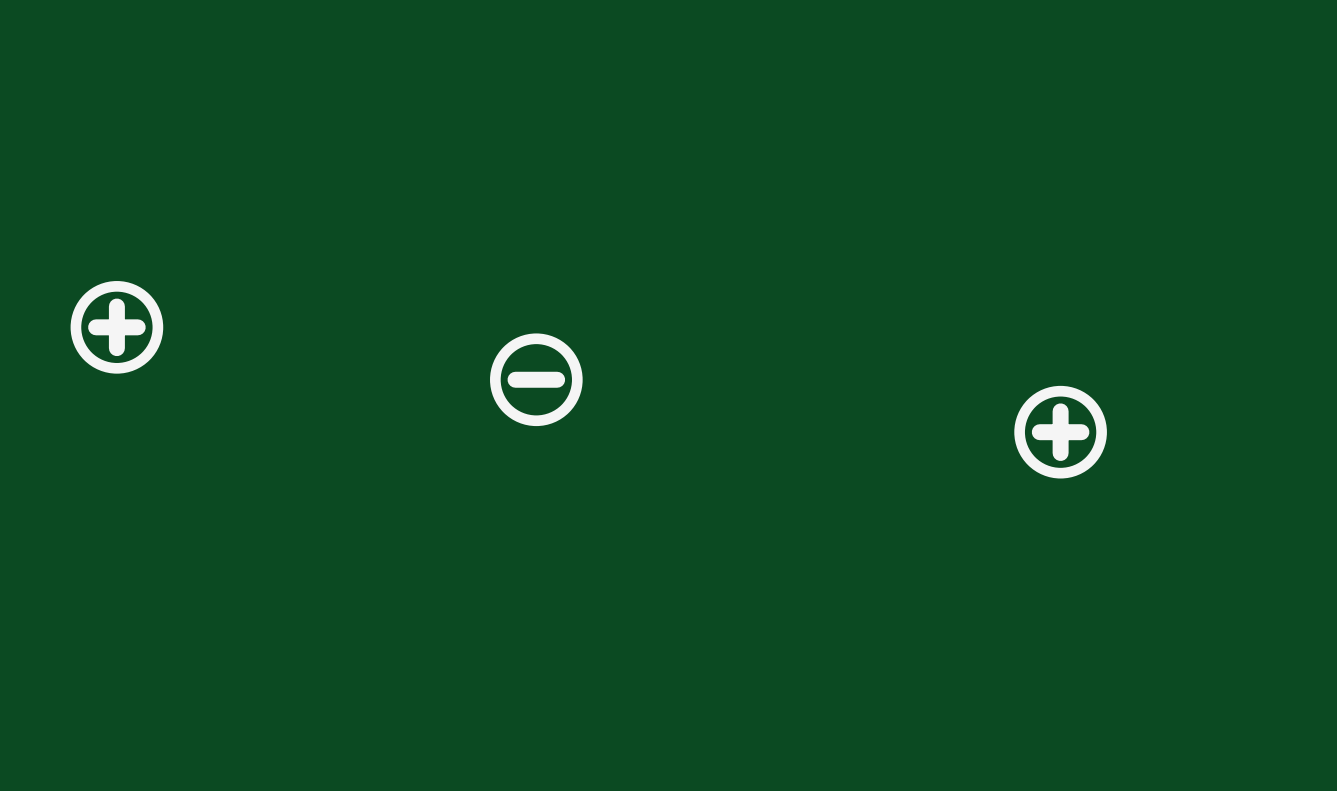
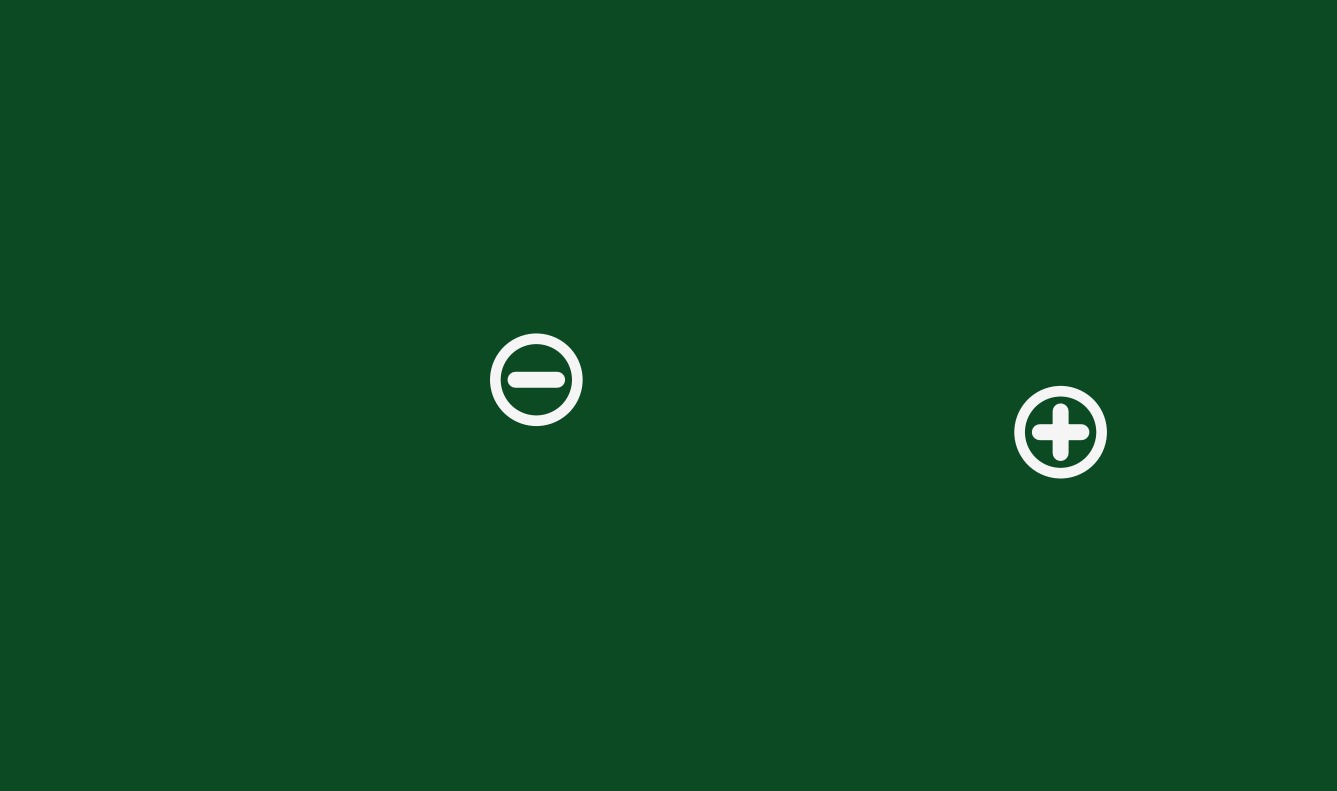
drawing: [70, 281, 164, 374] -> none

